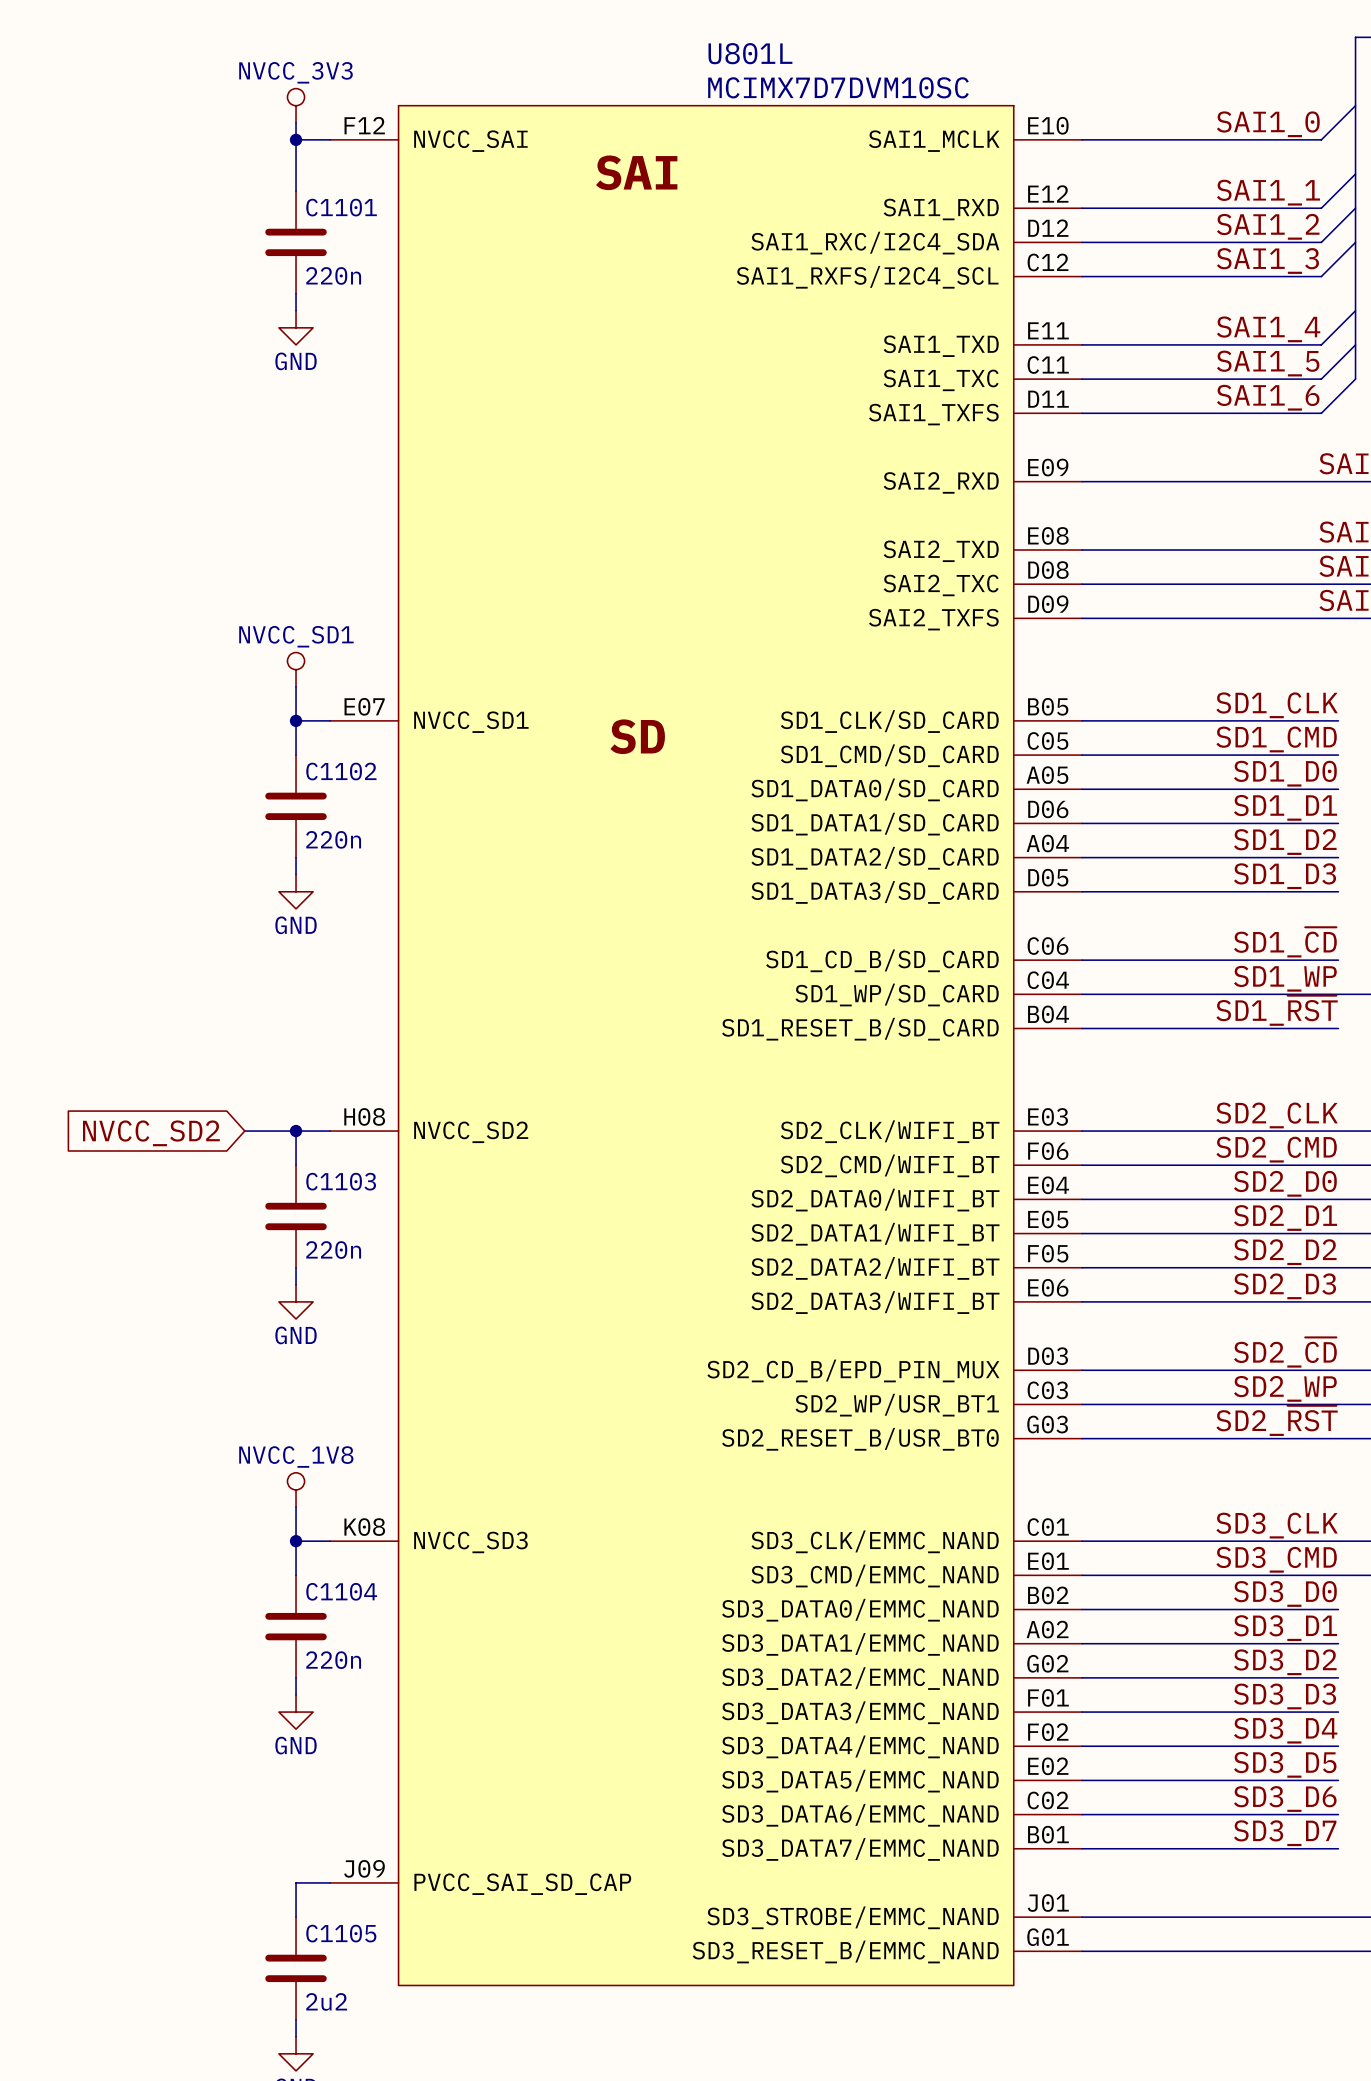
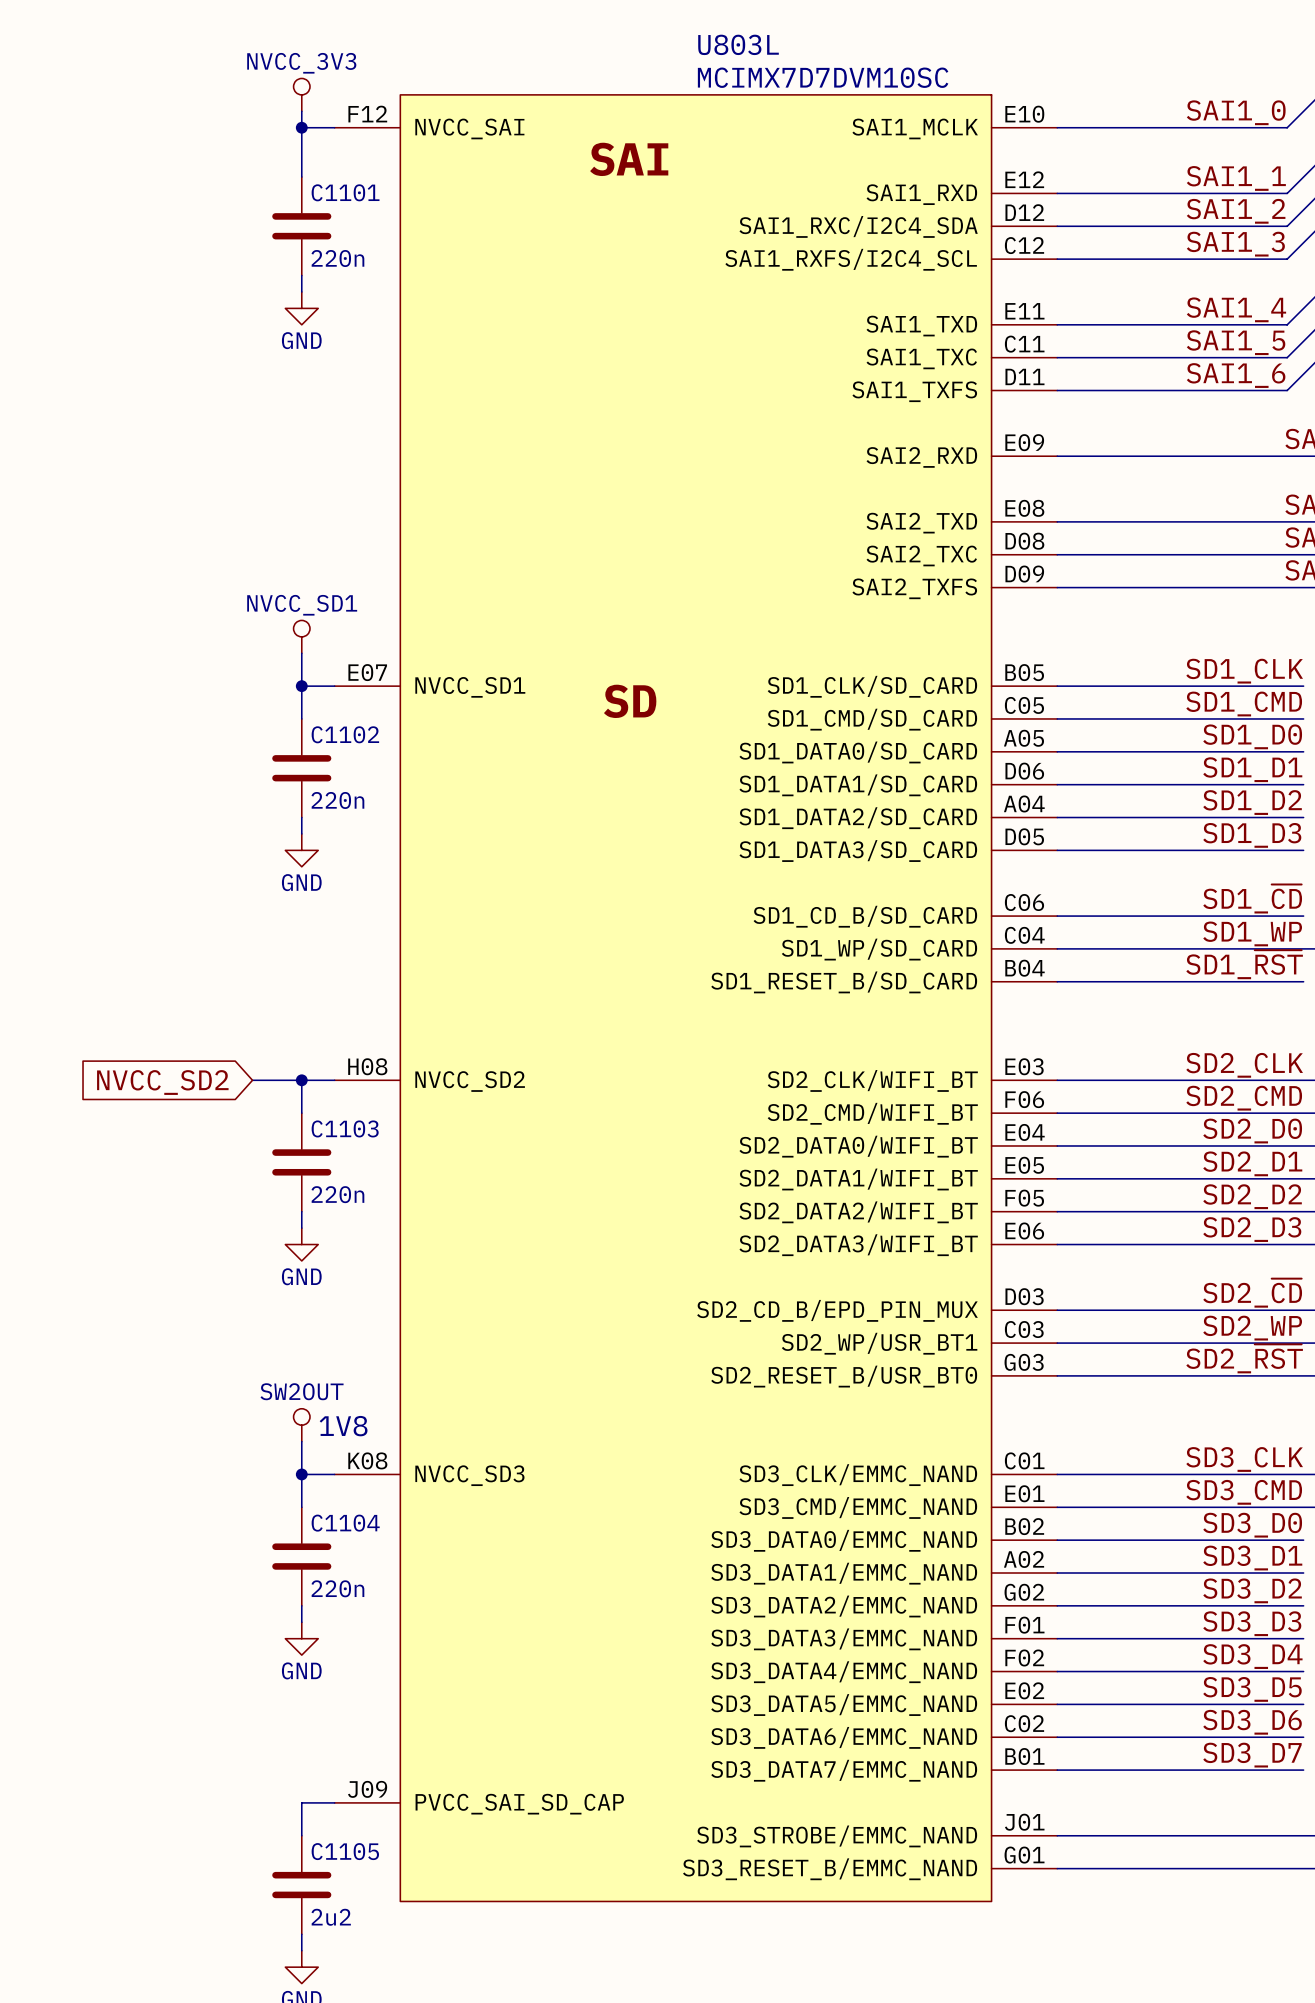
U801L name: U801L (750, 53) -> U803L (738, 44)
power symbol: NVCC_1V8 (296, 1489) -> SW2OUT (301, 1425)
text: none -> 1V8 (343, 1426)

